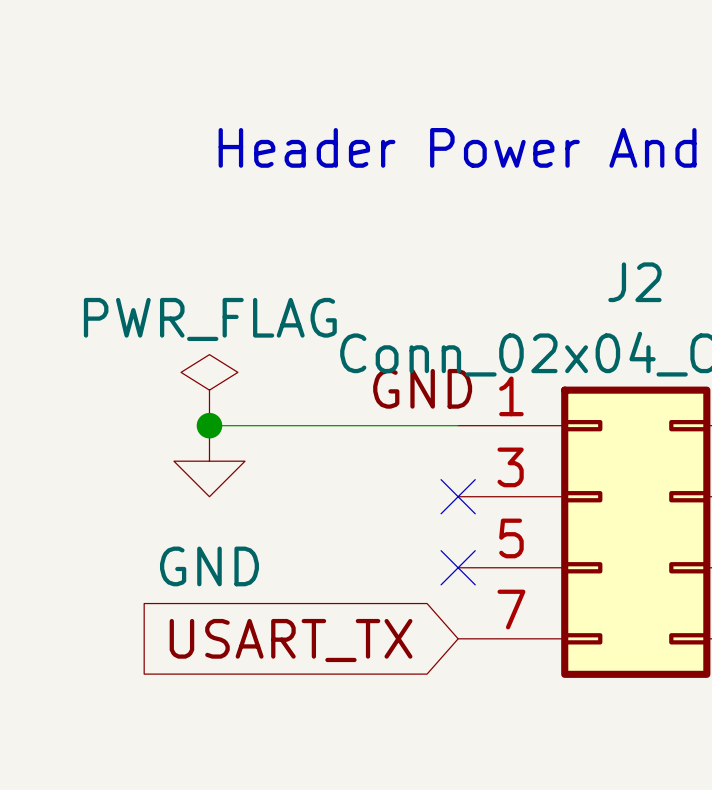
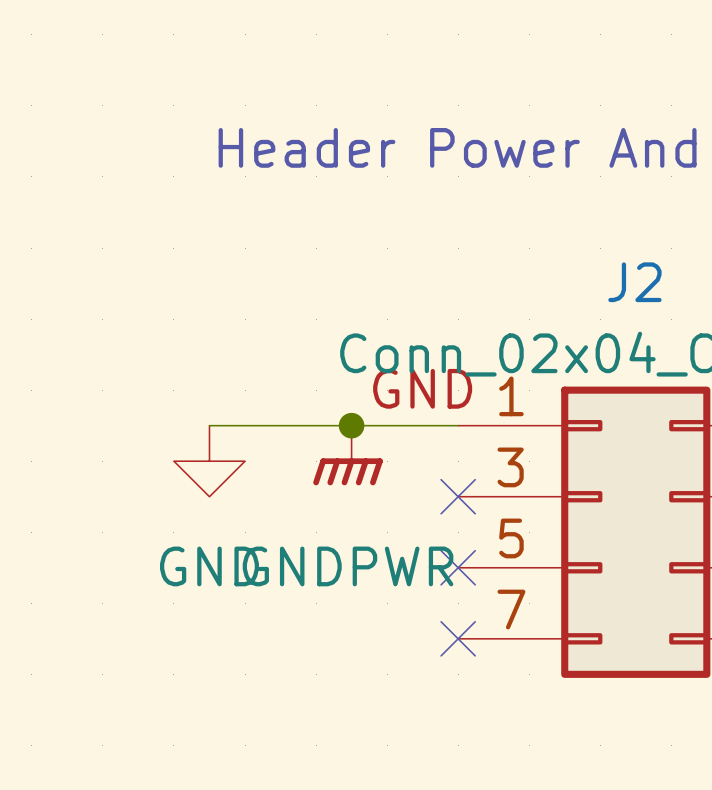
power symbol: PWR_FLAG (209, 390) -> none
junction position: (209, 425) -> (351, 425)
power symbol: none -> GNDPWR (348, 455)
no-connect mark: none -> (458, 638)
global label: USART_TX (291, 640) -> none

